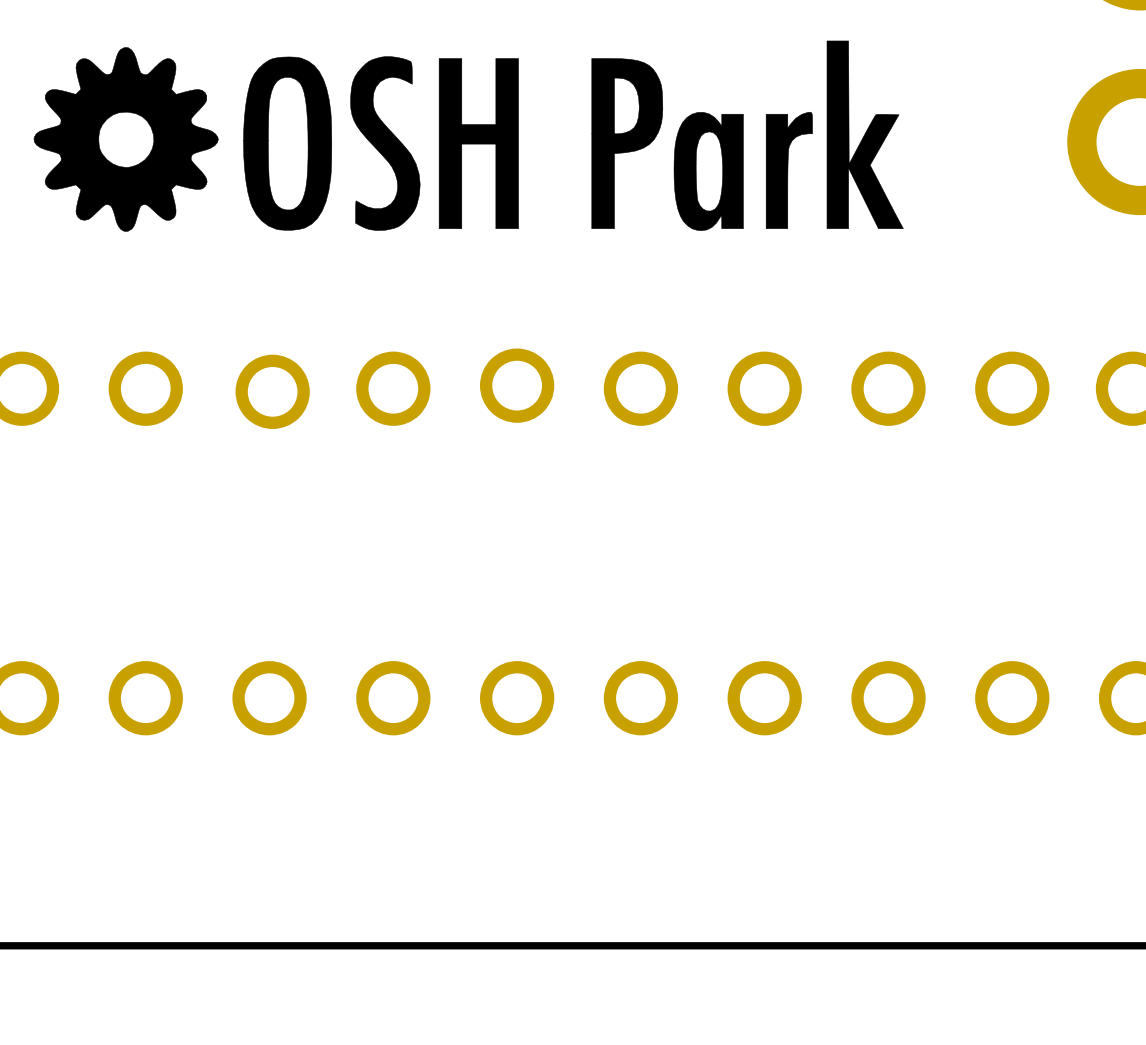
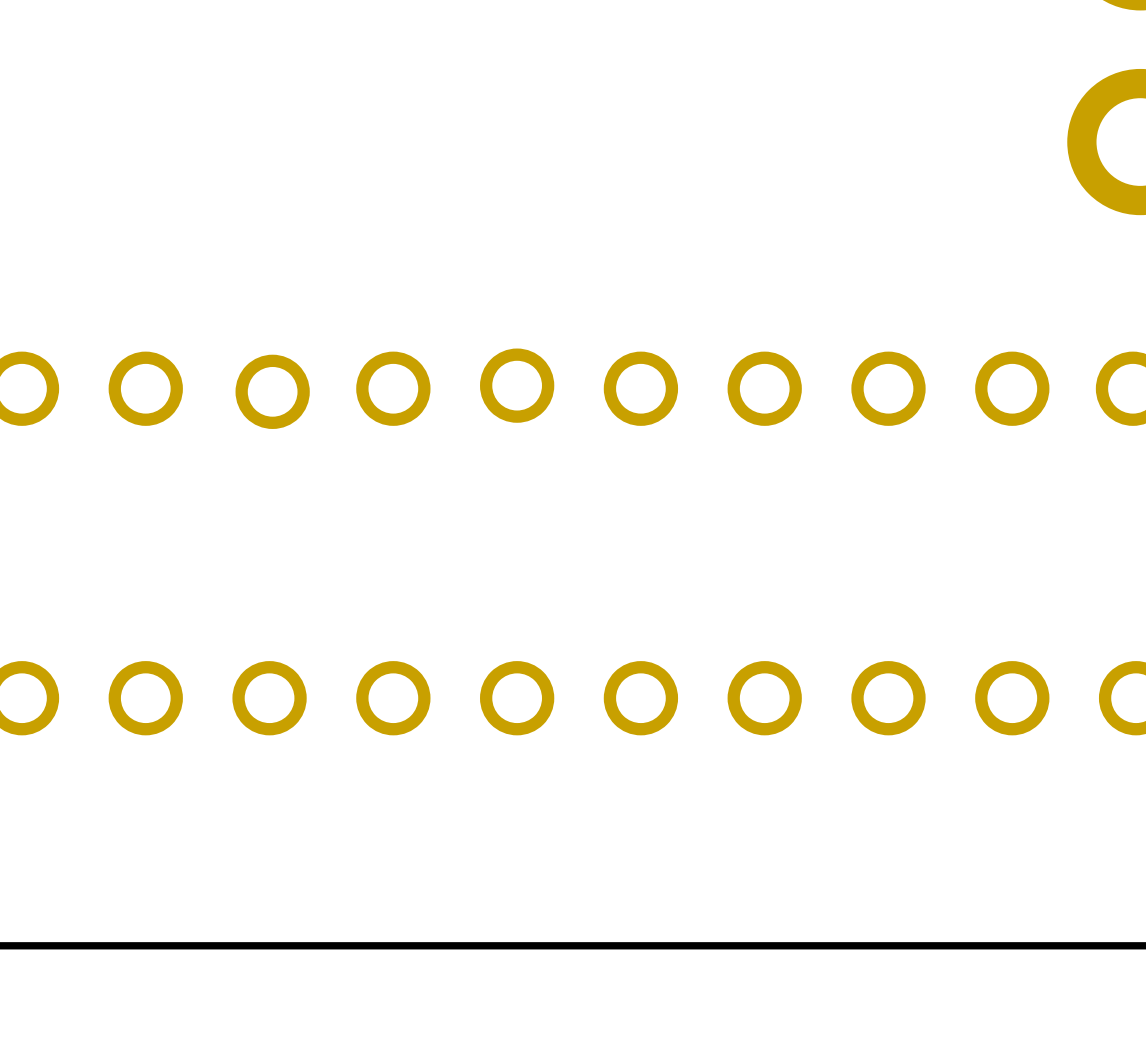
drawing: [33, 40, 904, 232] -> none

